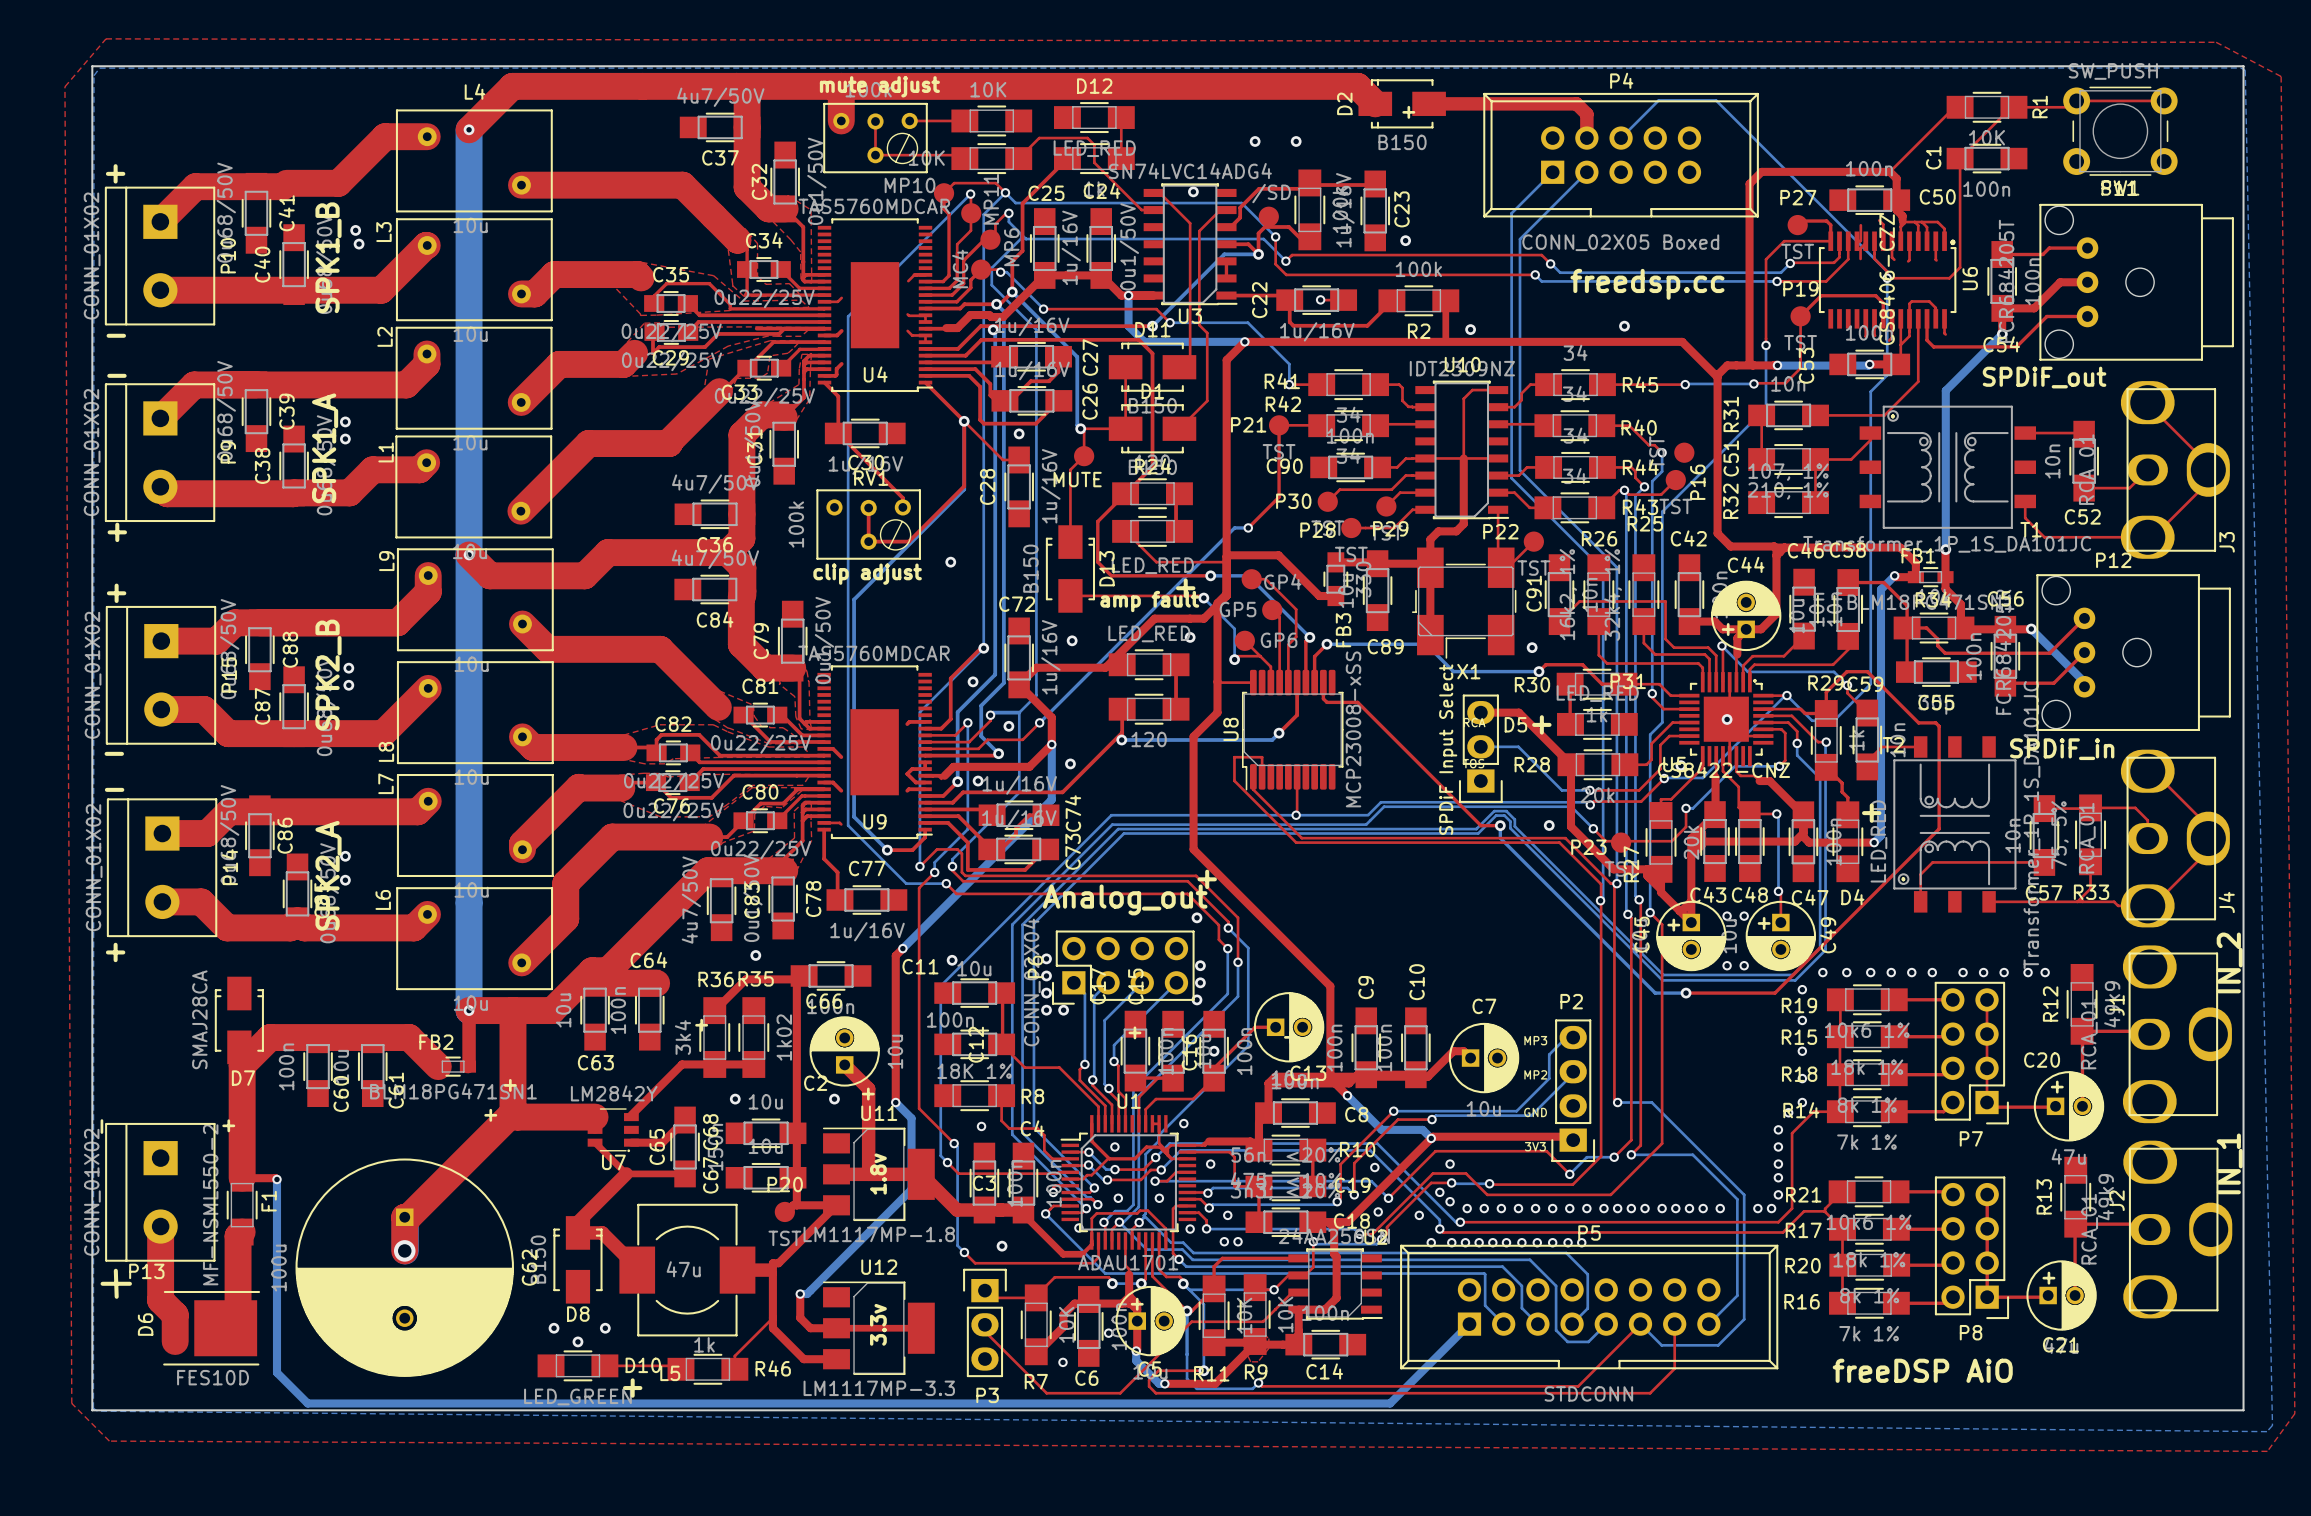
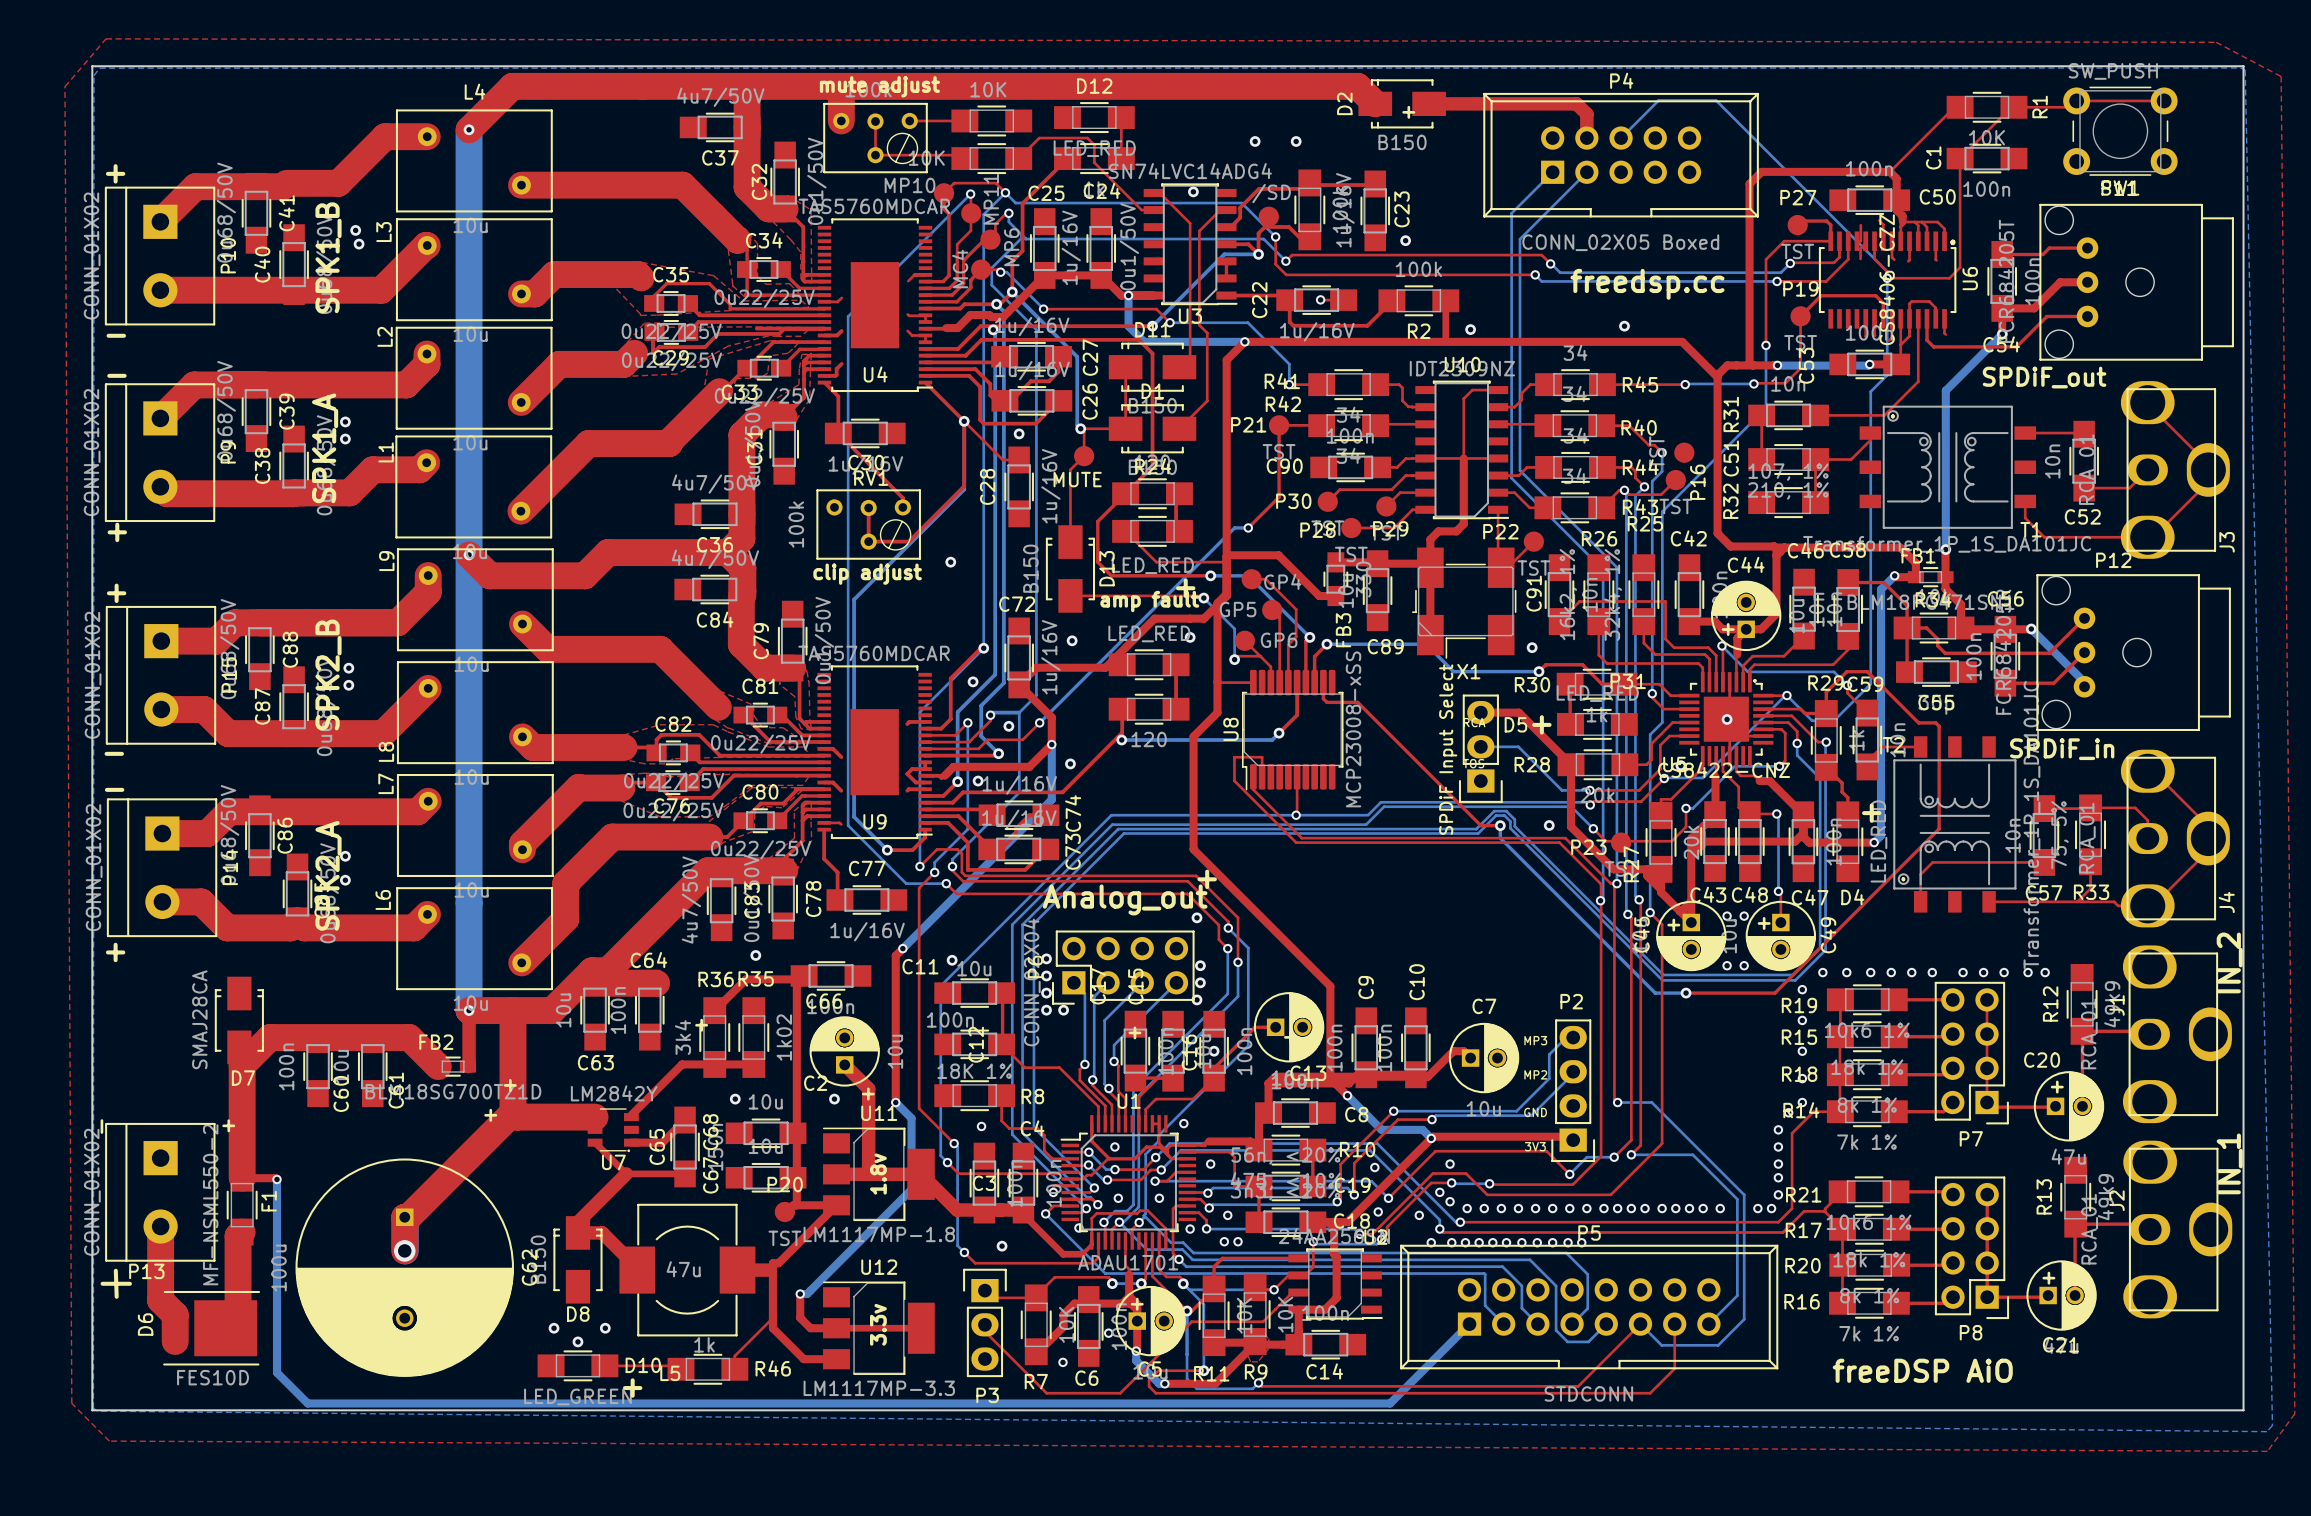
FB2 value: BLM18PG471SN1 (453, 1091) -> BLM18SG700TZ1D (453, 1091)

